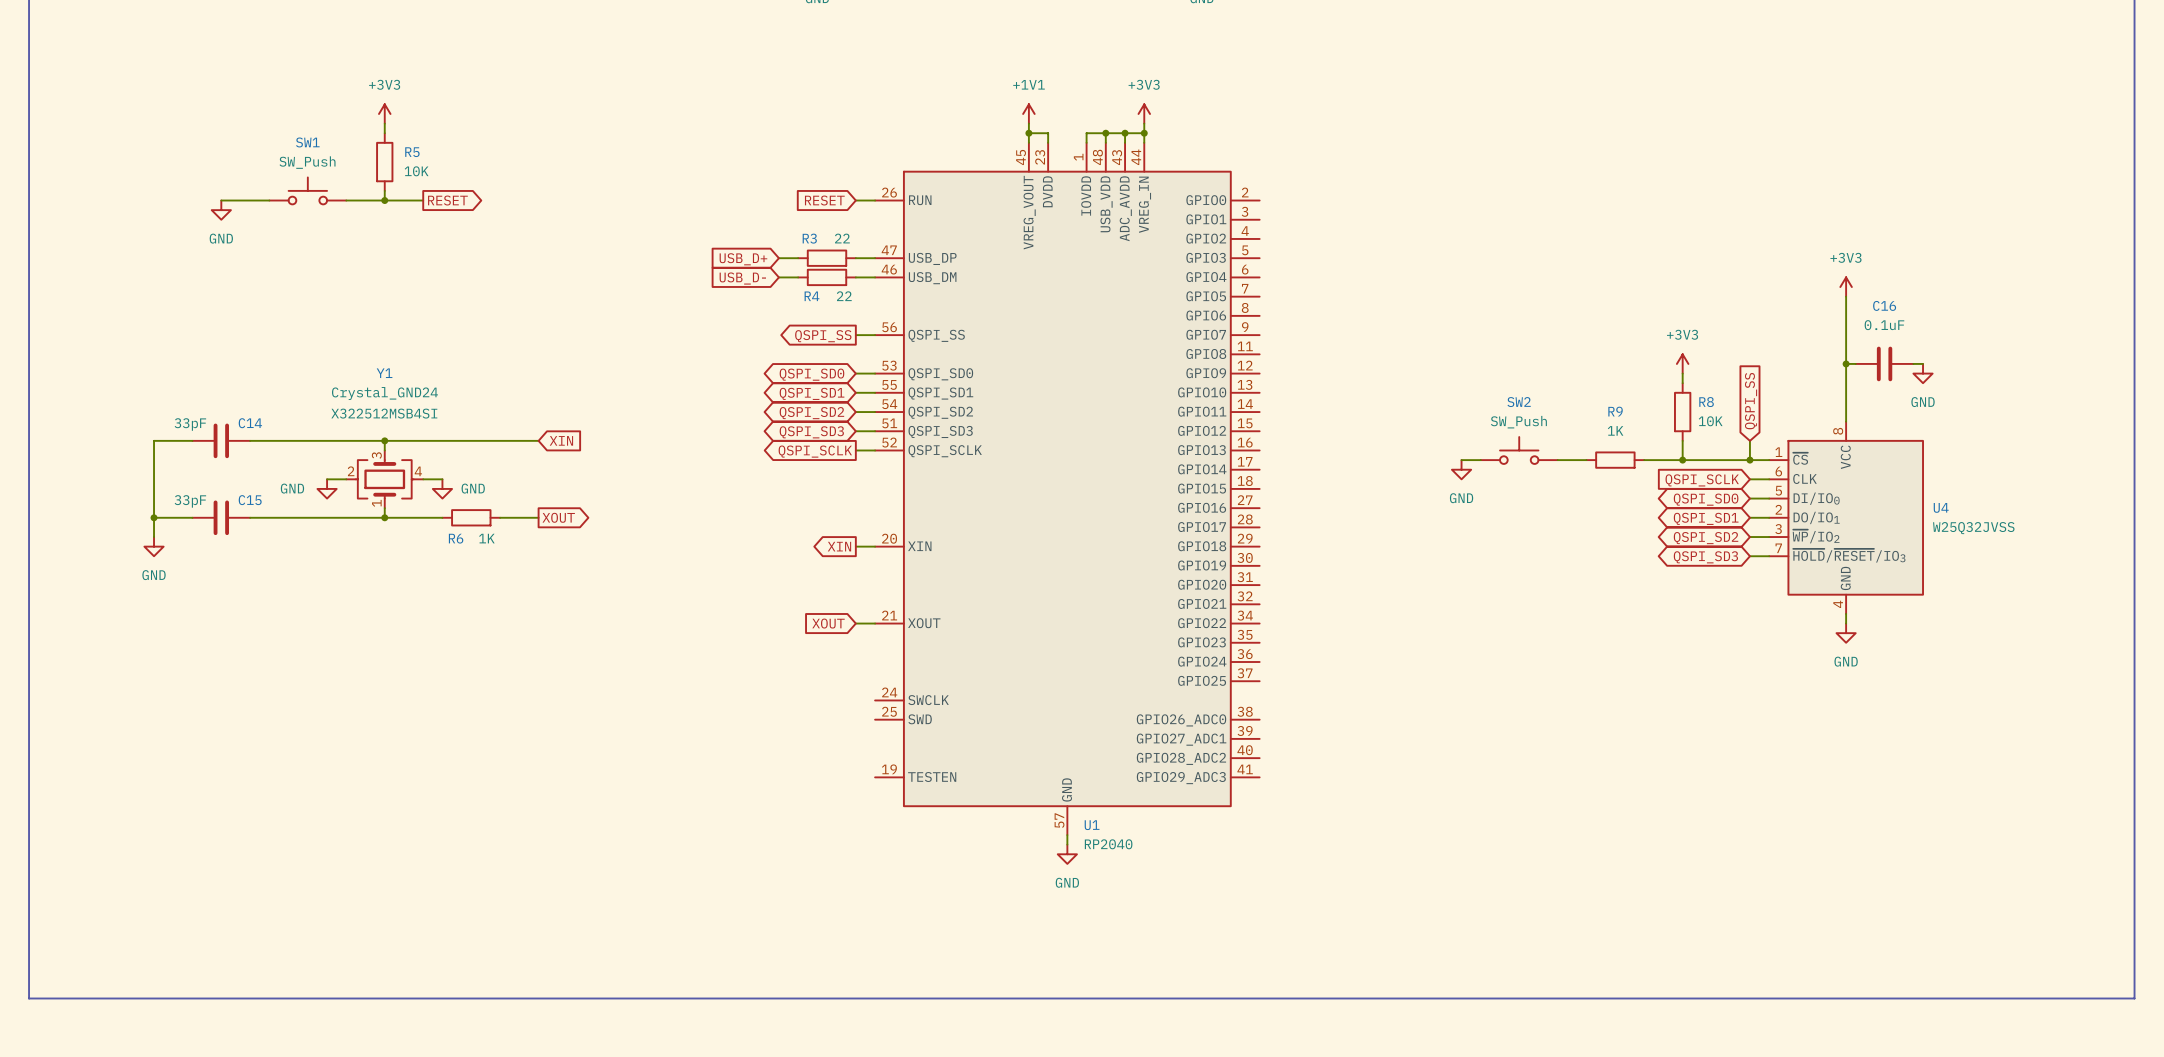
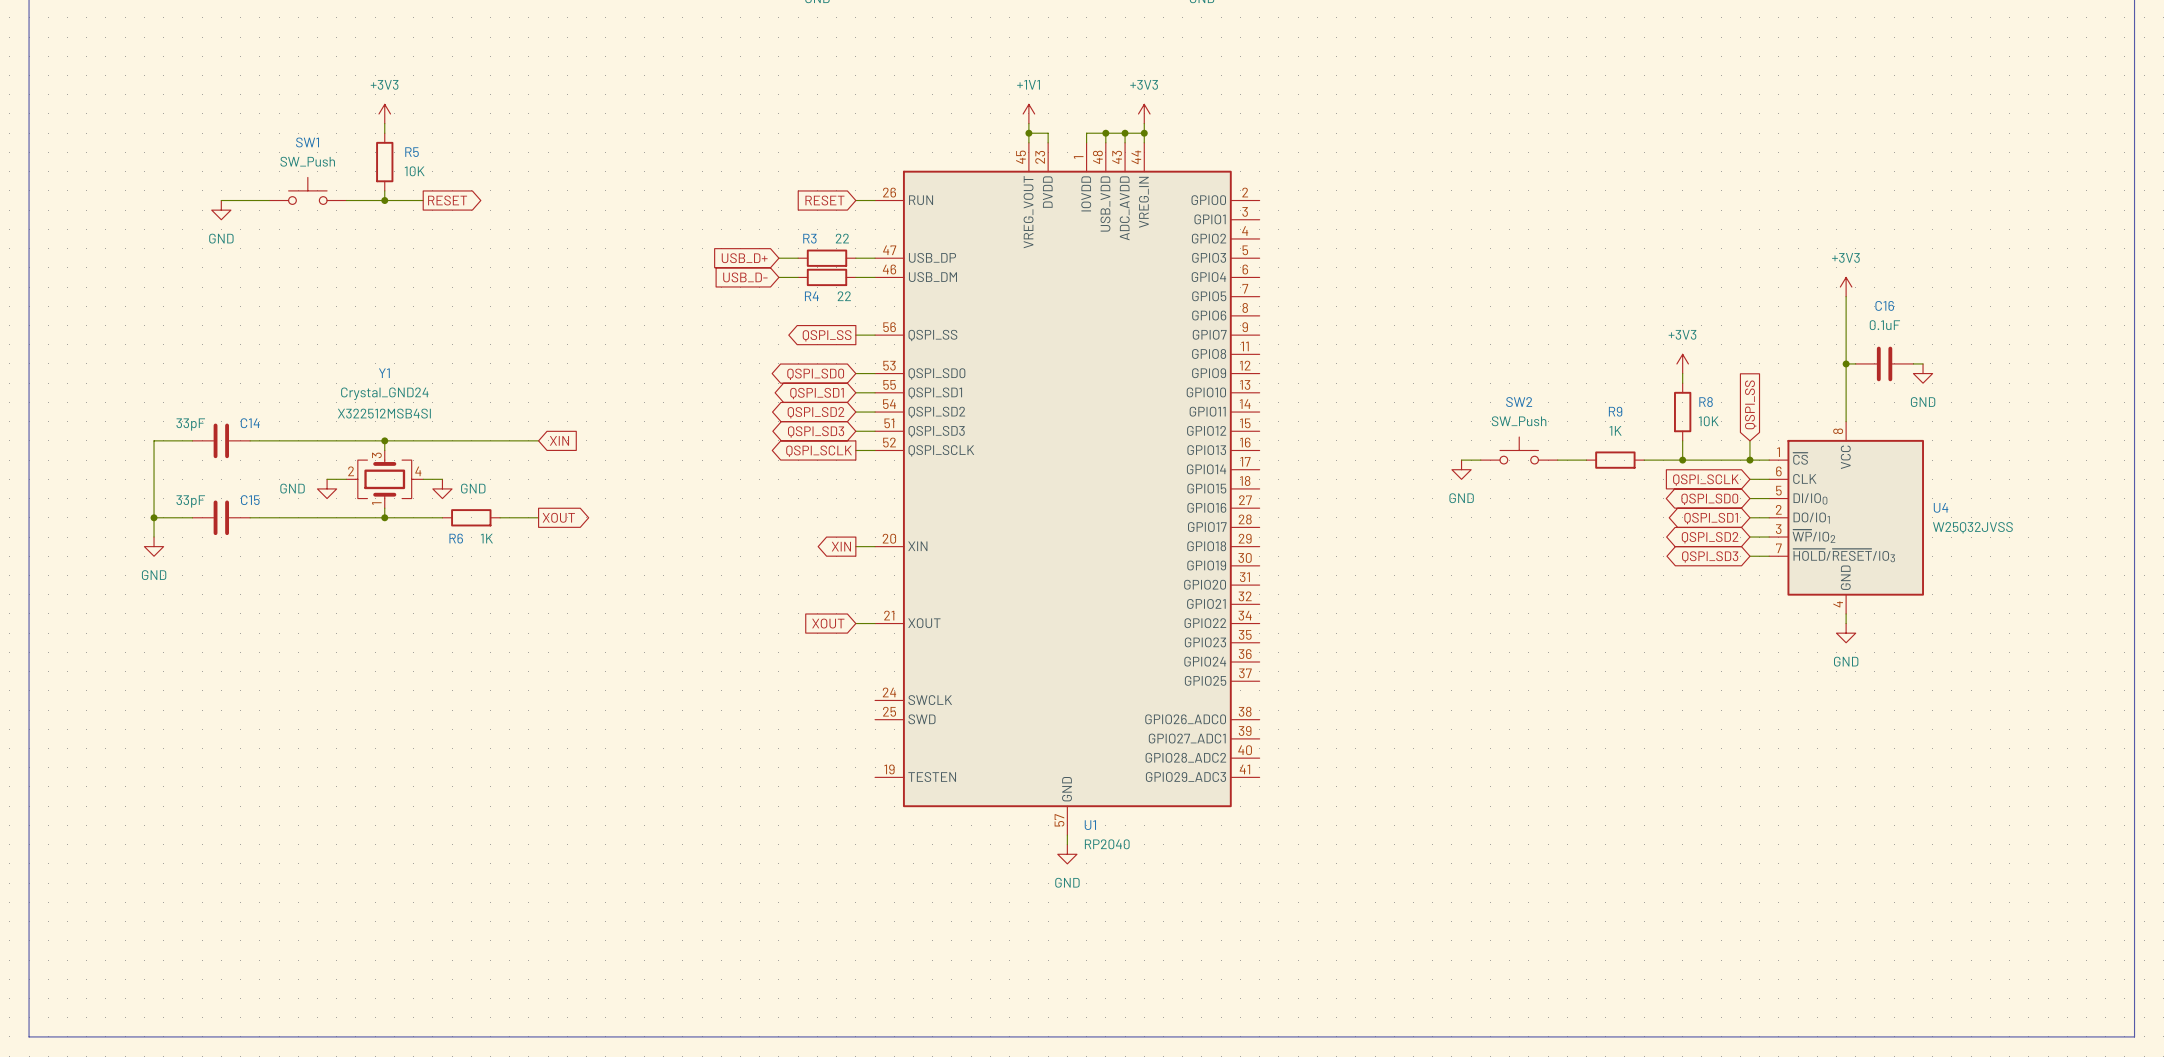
line: (29, 998) (2134, 998) -> (29, 998) (29, 1036) (2134, 1036) (2134, 998)

